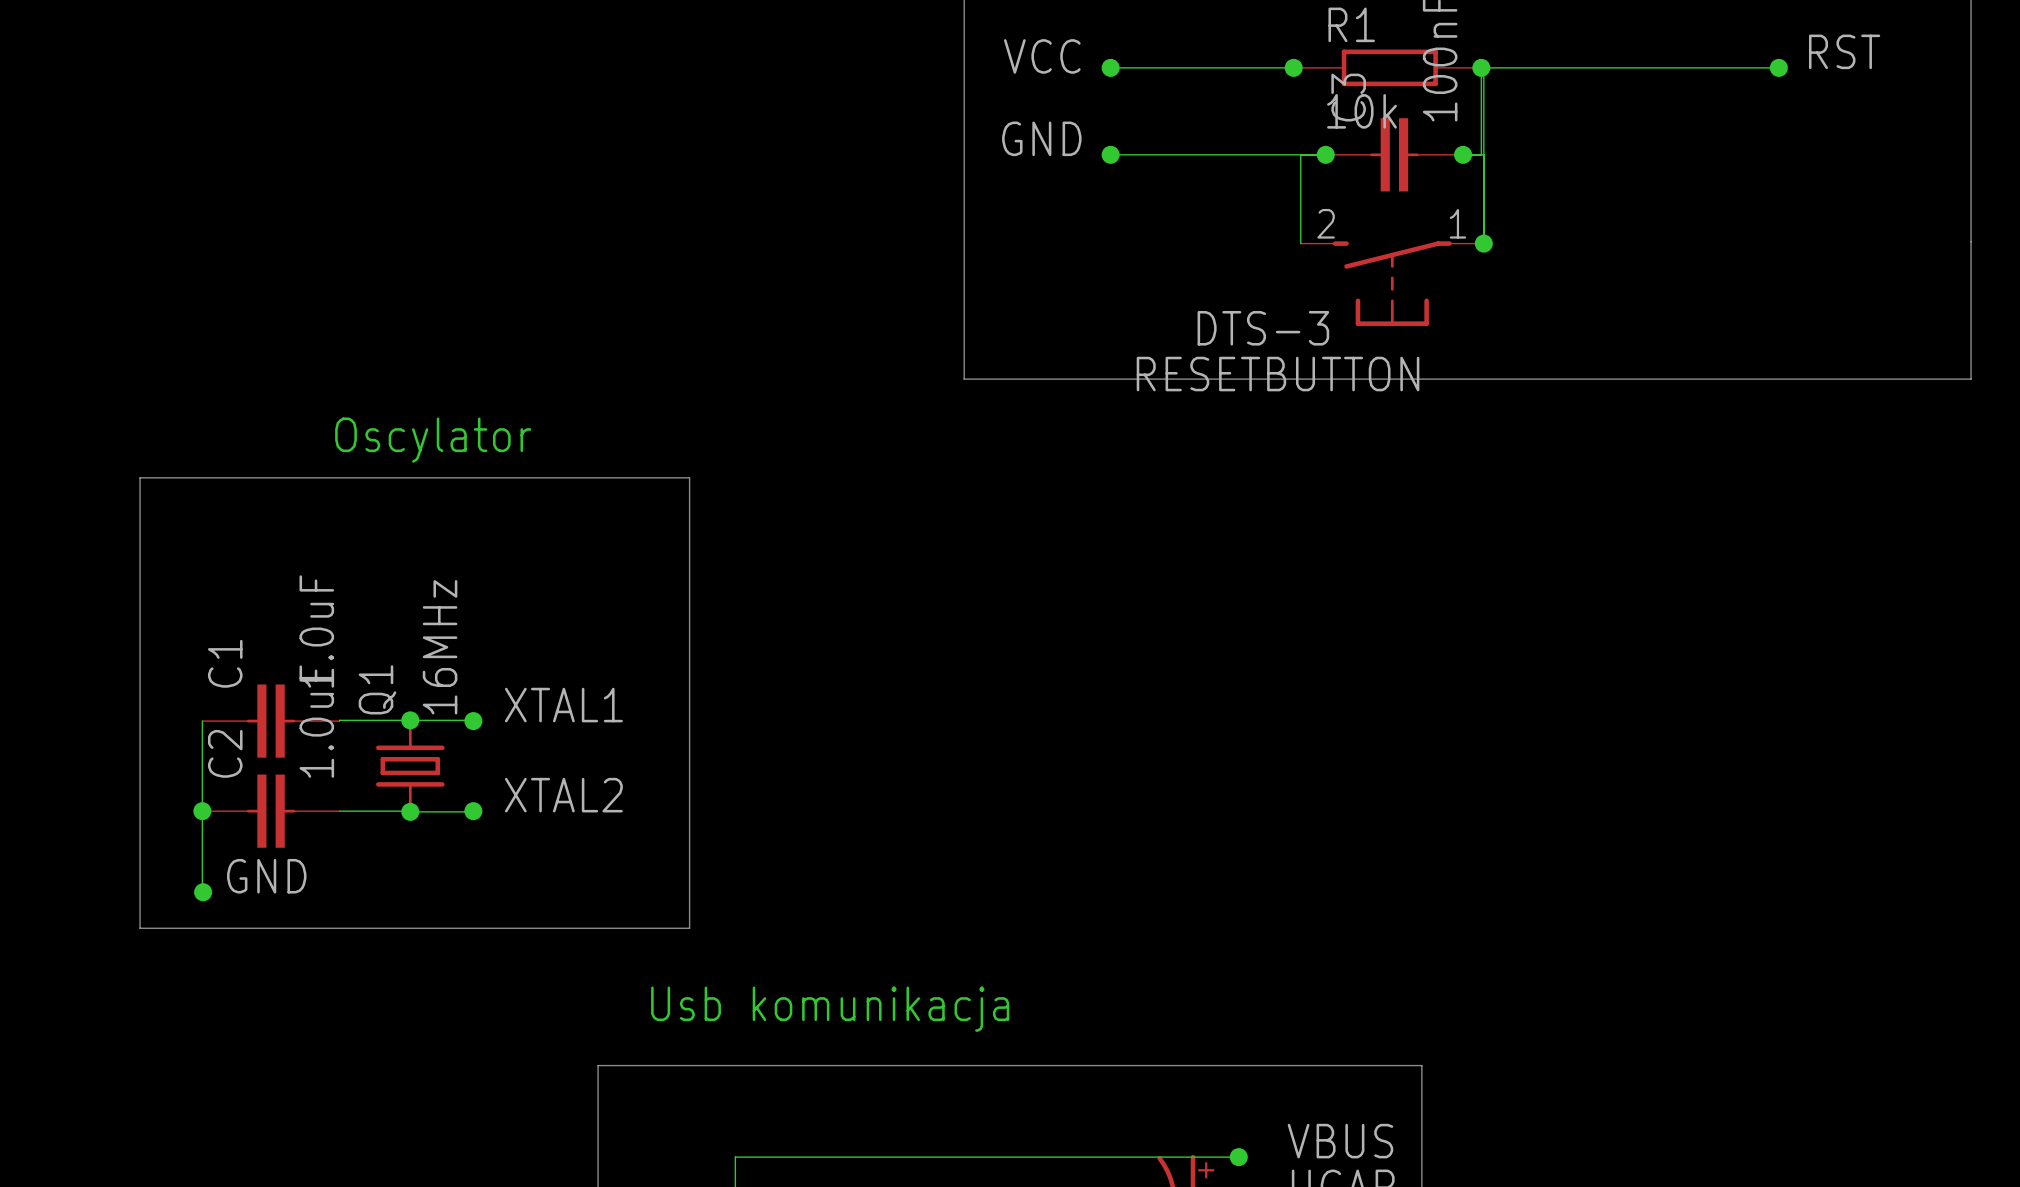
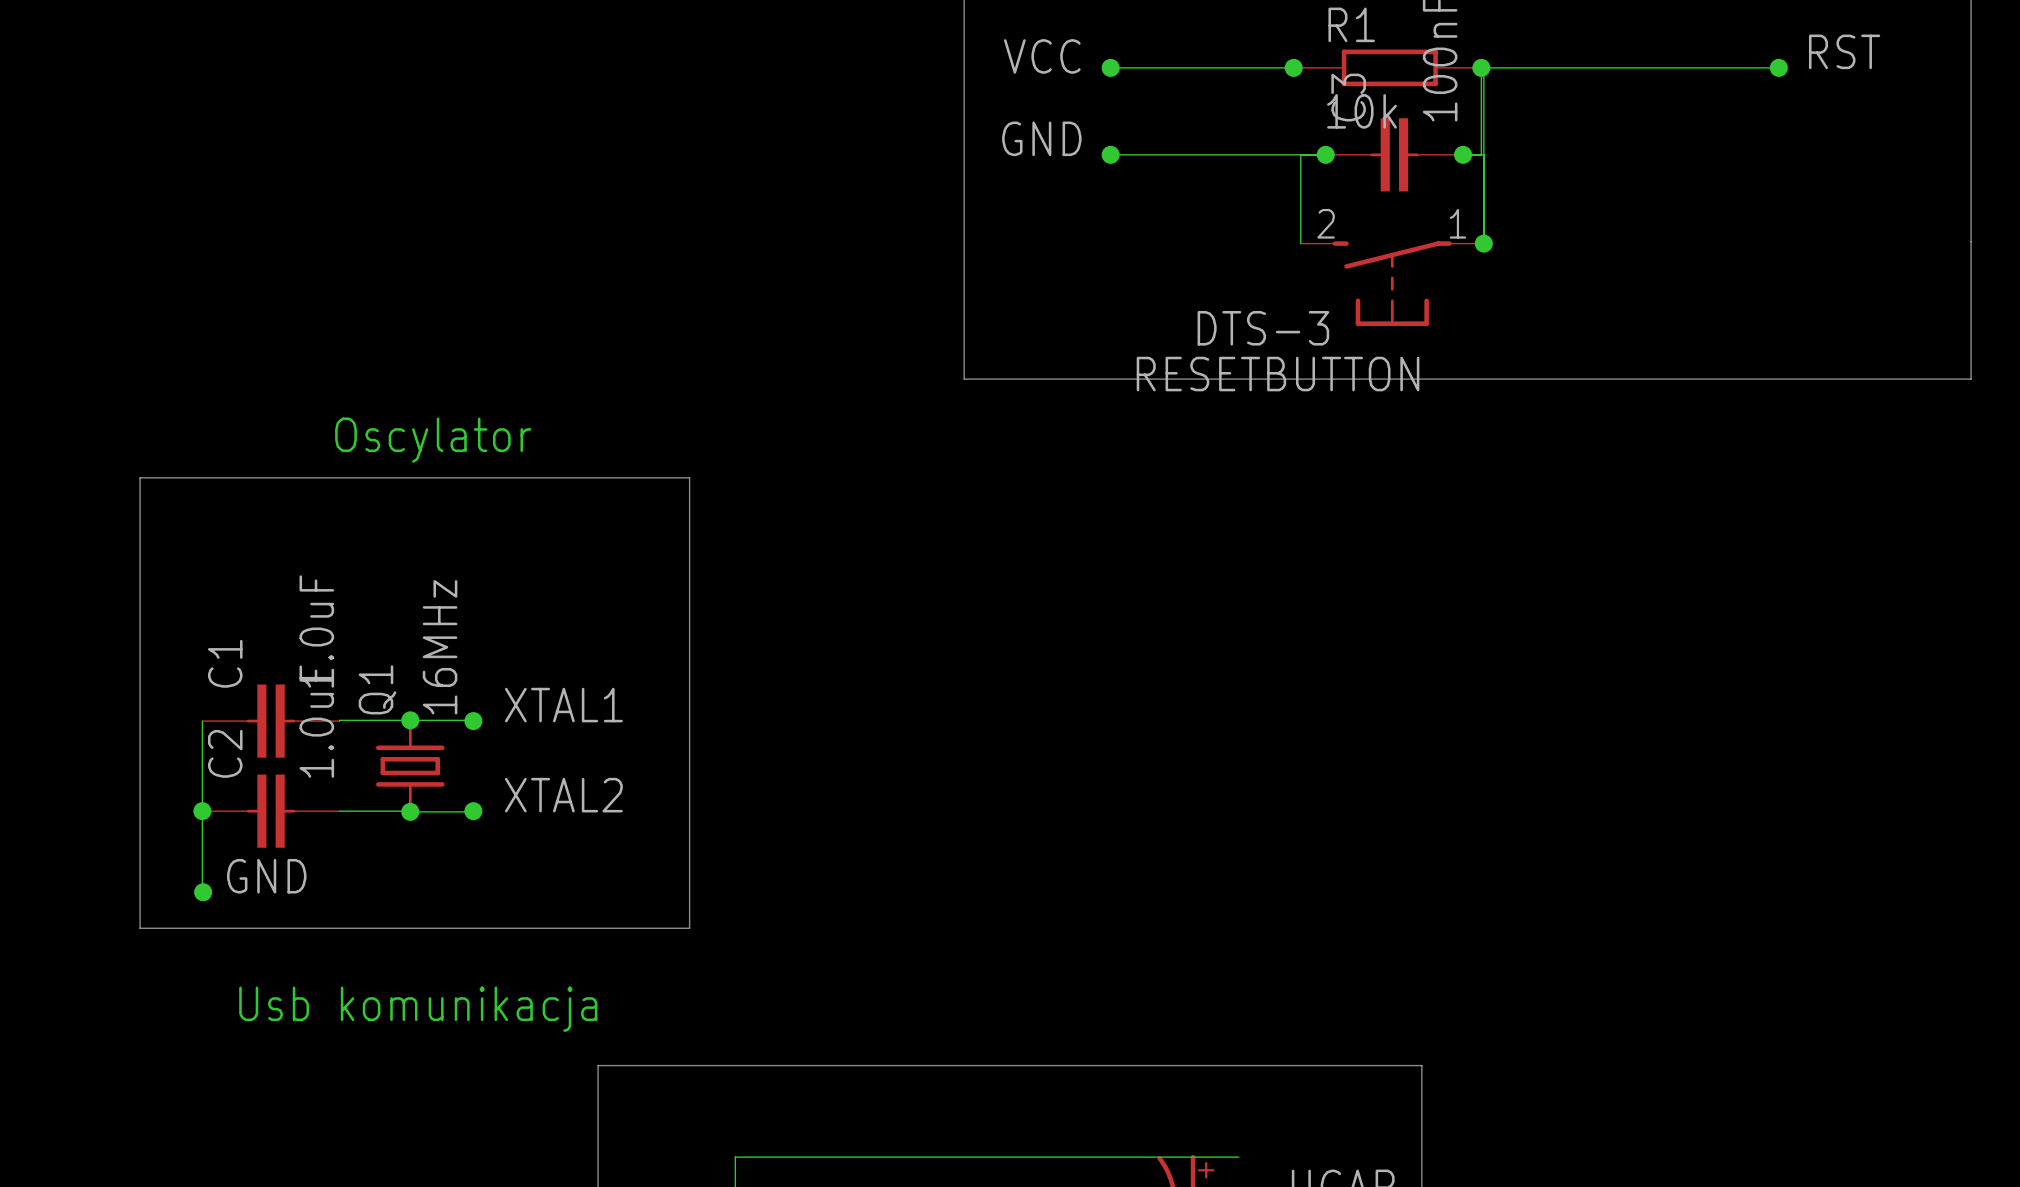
text position: Usb komunikacja (830, 1009) -> Usb komunikacja (418, 1009)
label: VBUS (1340, 1141) -> none
junction: (1238, 1157) -> none

